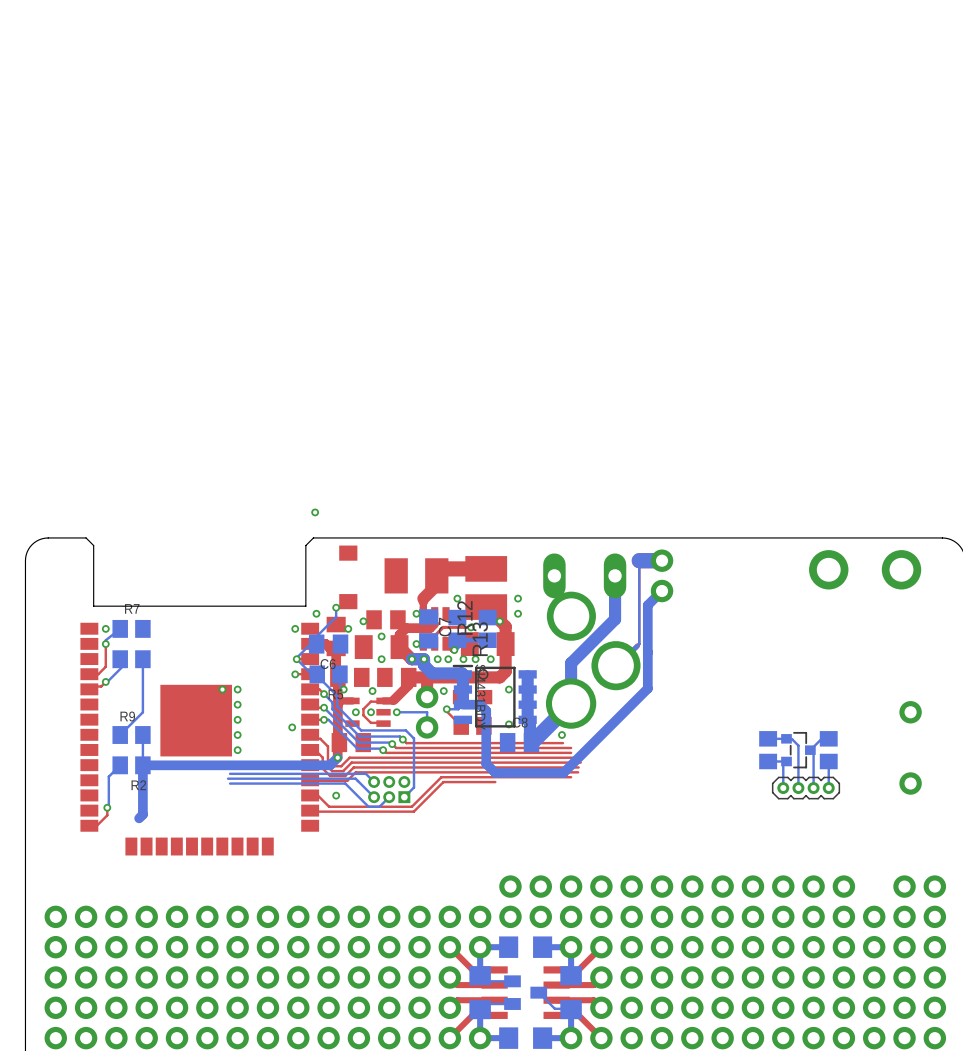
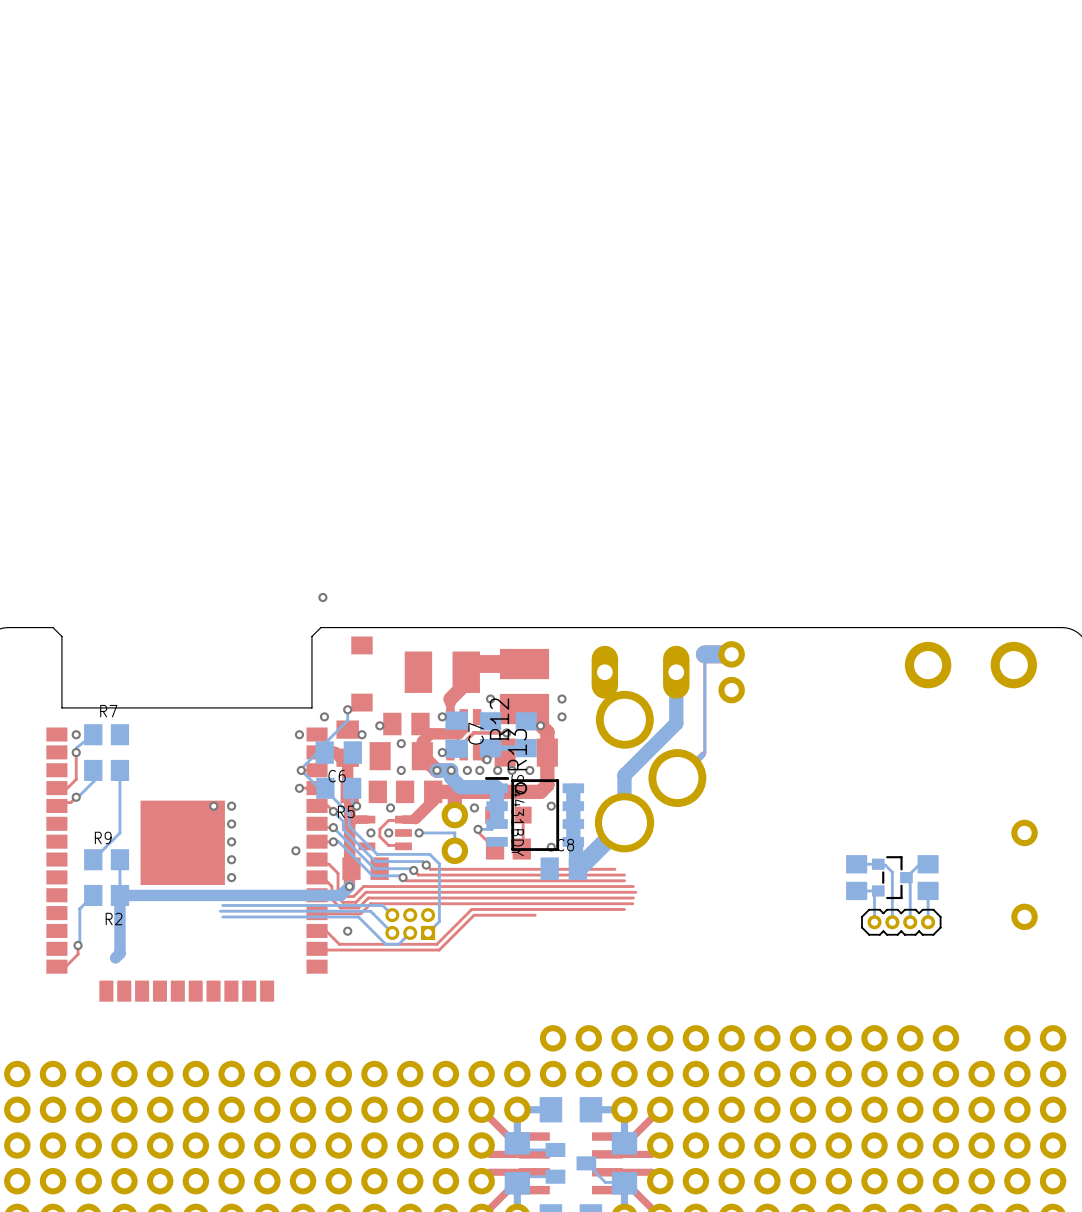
bottom track: (662, 591) (647, 605) (647, 688) (563, 772) (495, 772) (486, 763) (486, 710) (480, 704) (462, 704) -> none
via: (561, 735) -> none

